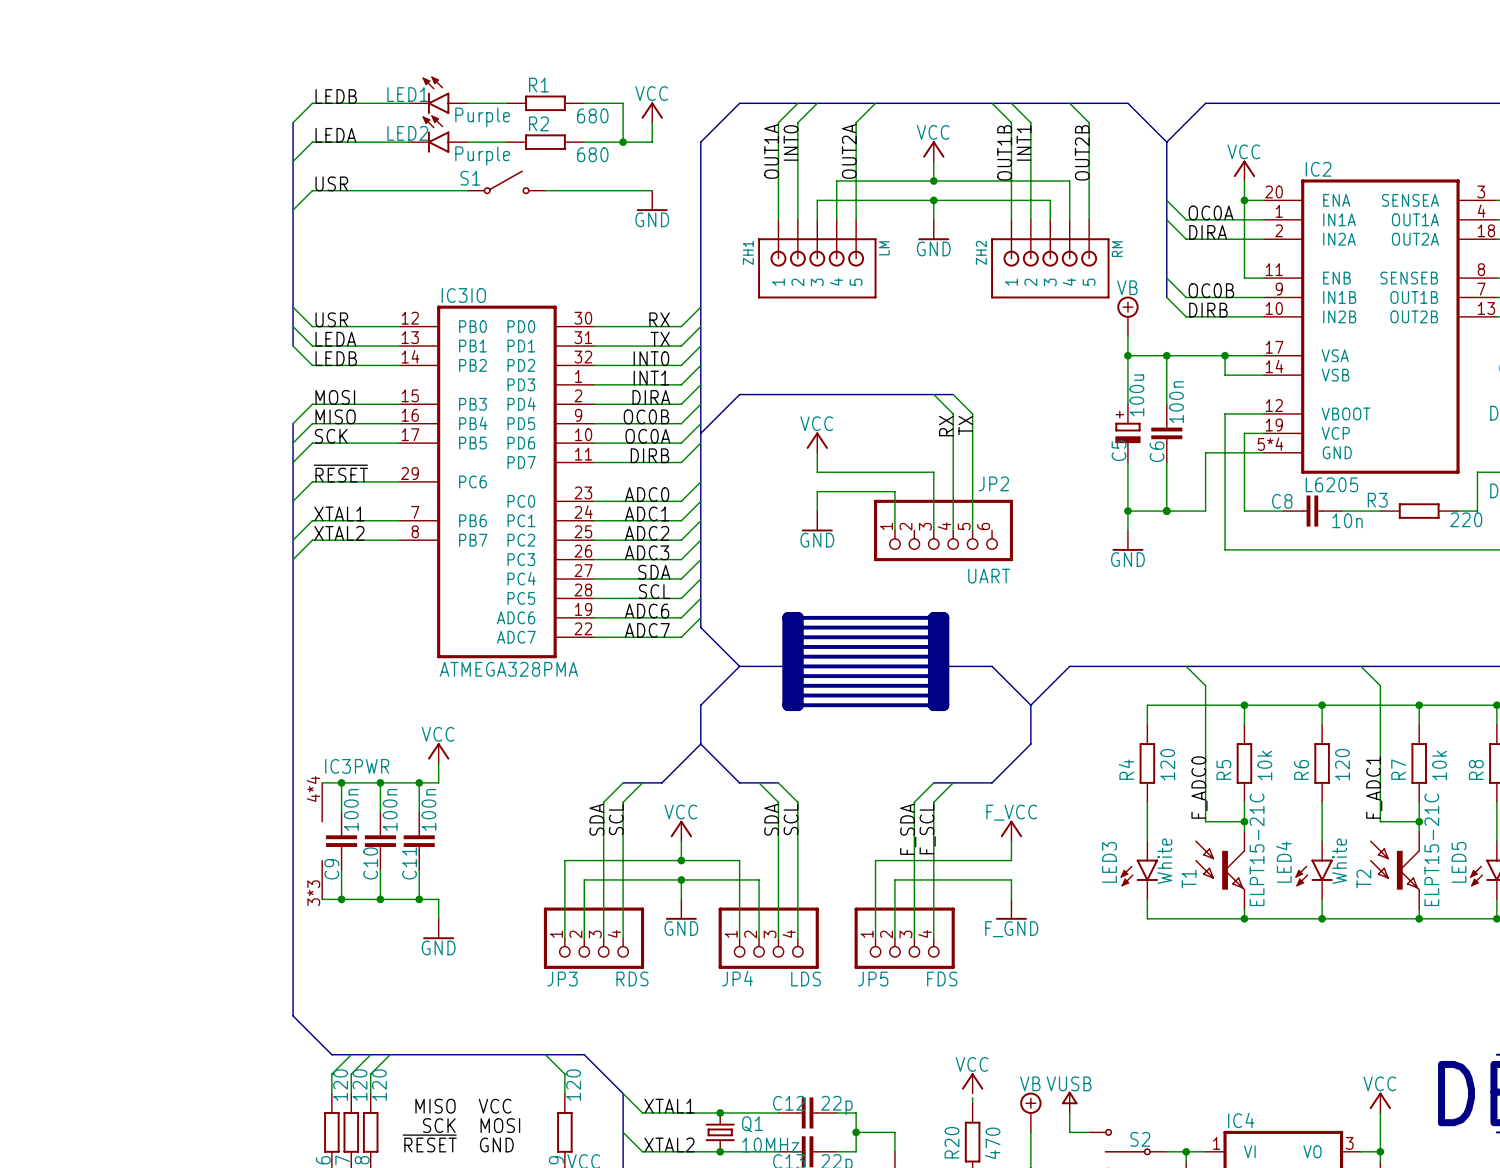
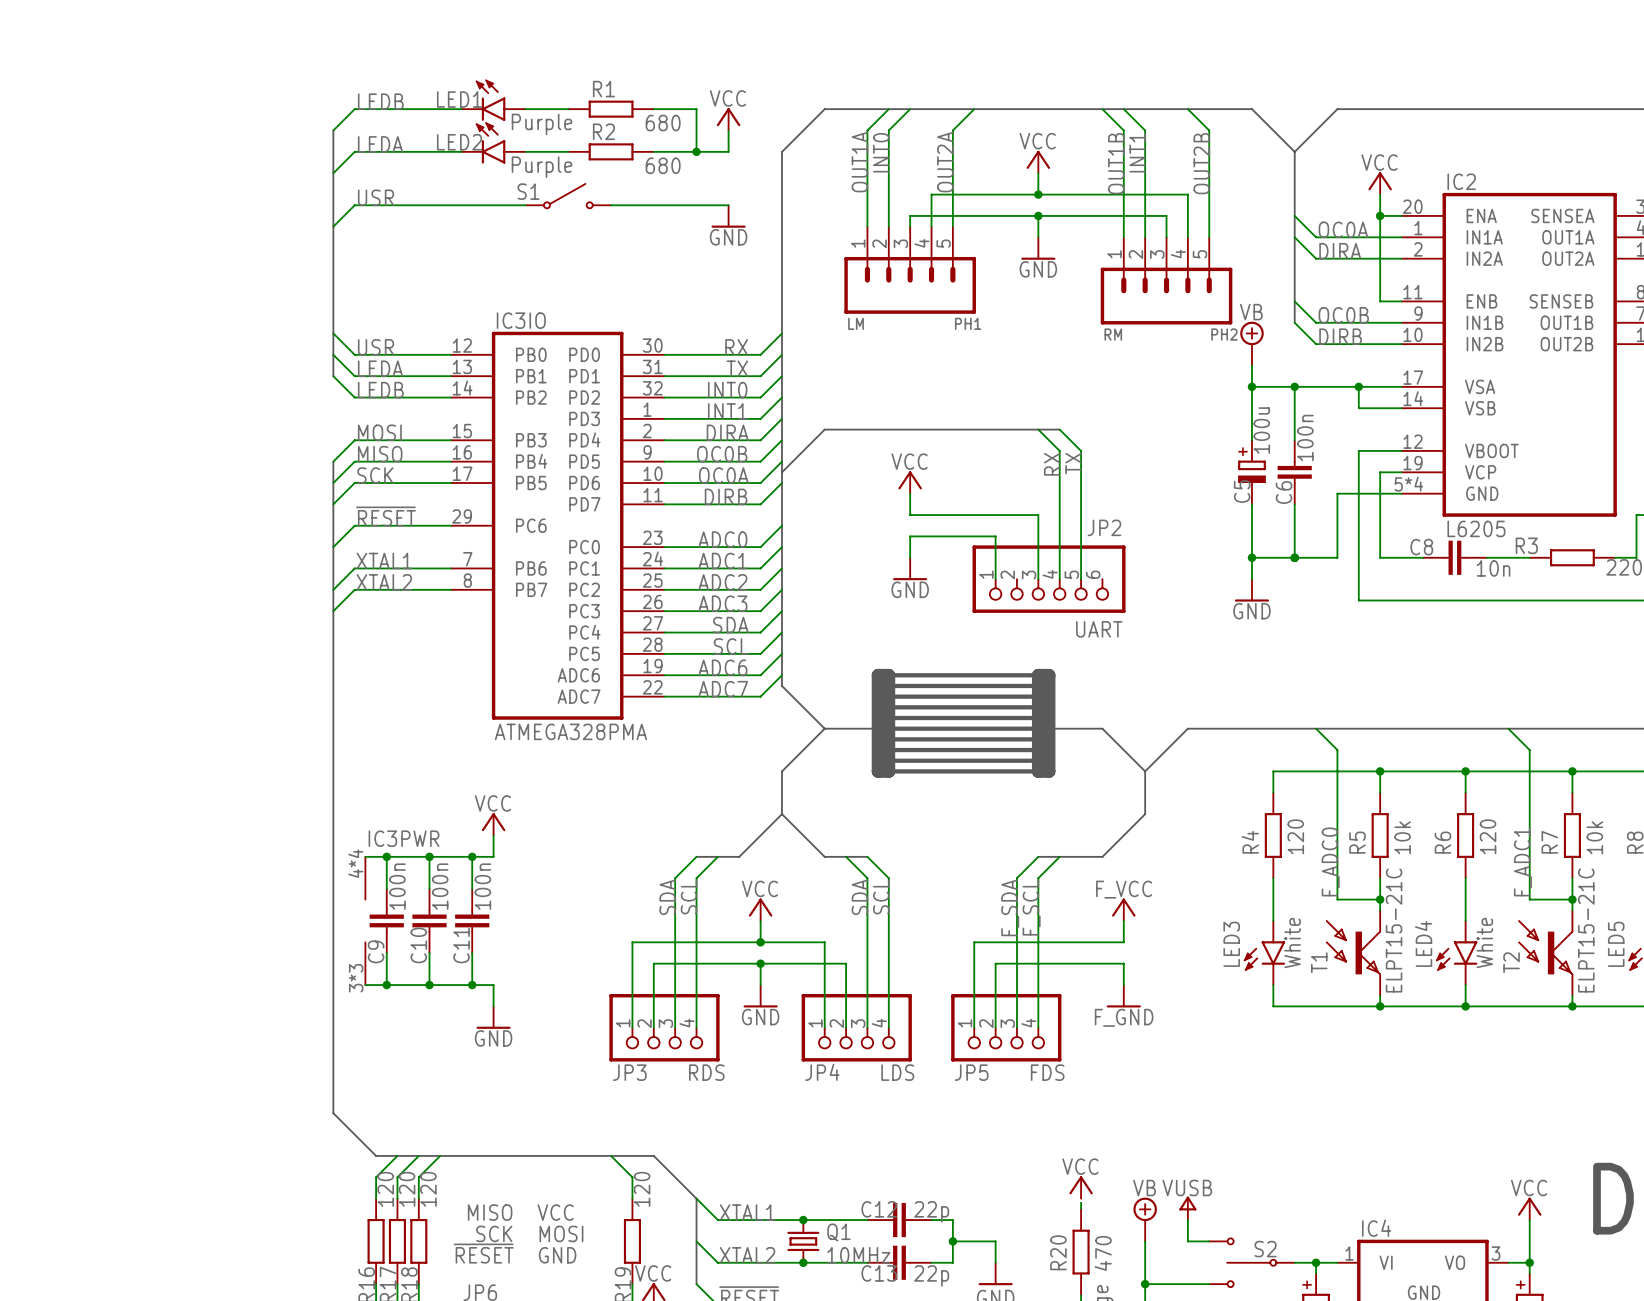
PH1: none -> LM (910, 270)
ZH1: LM (817, 259) -> none
ZH2: RM (1050, 259) -> none
PH2: none -> RM (1166, 280)

